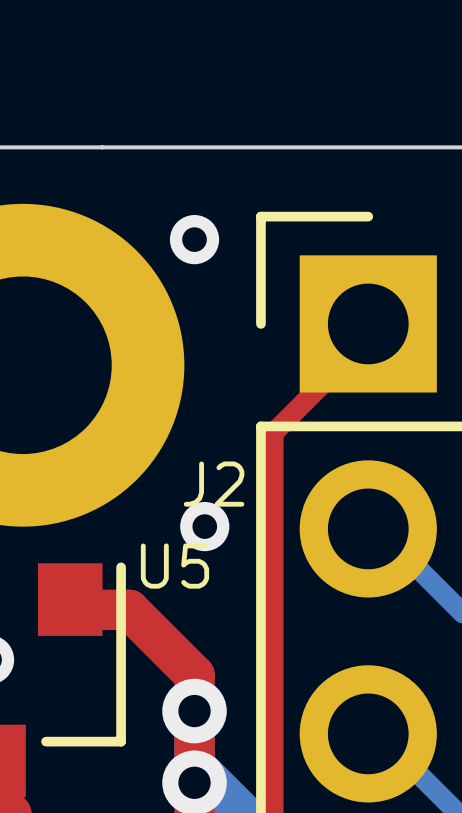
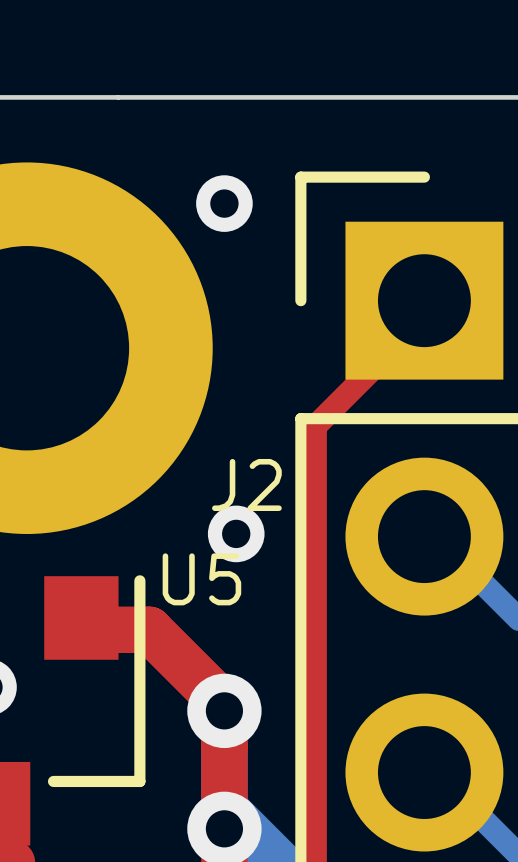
via position: (194, 711) -> (224, 710)

